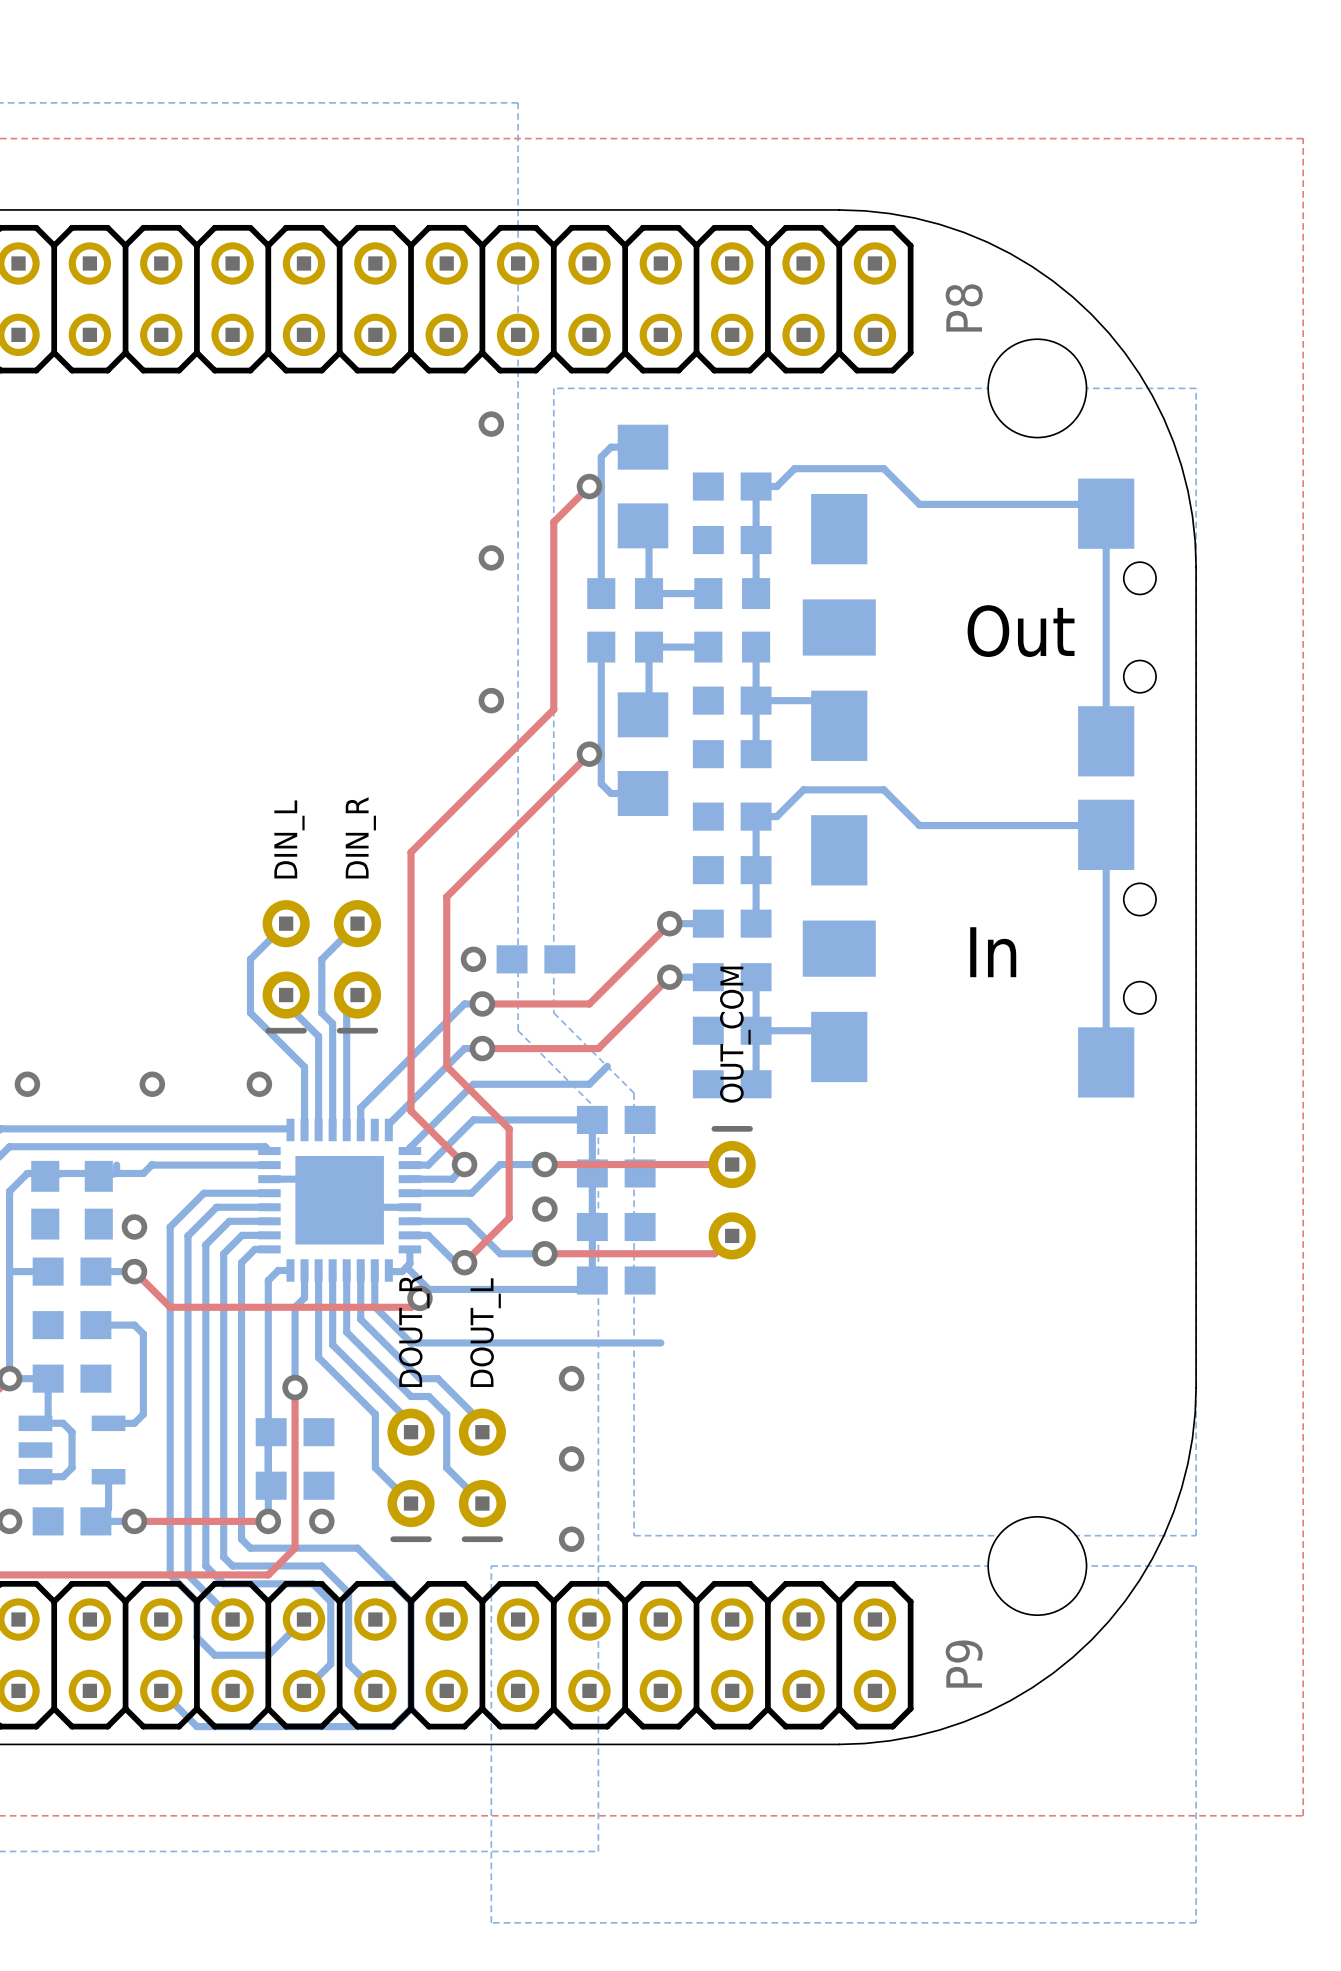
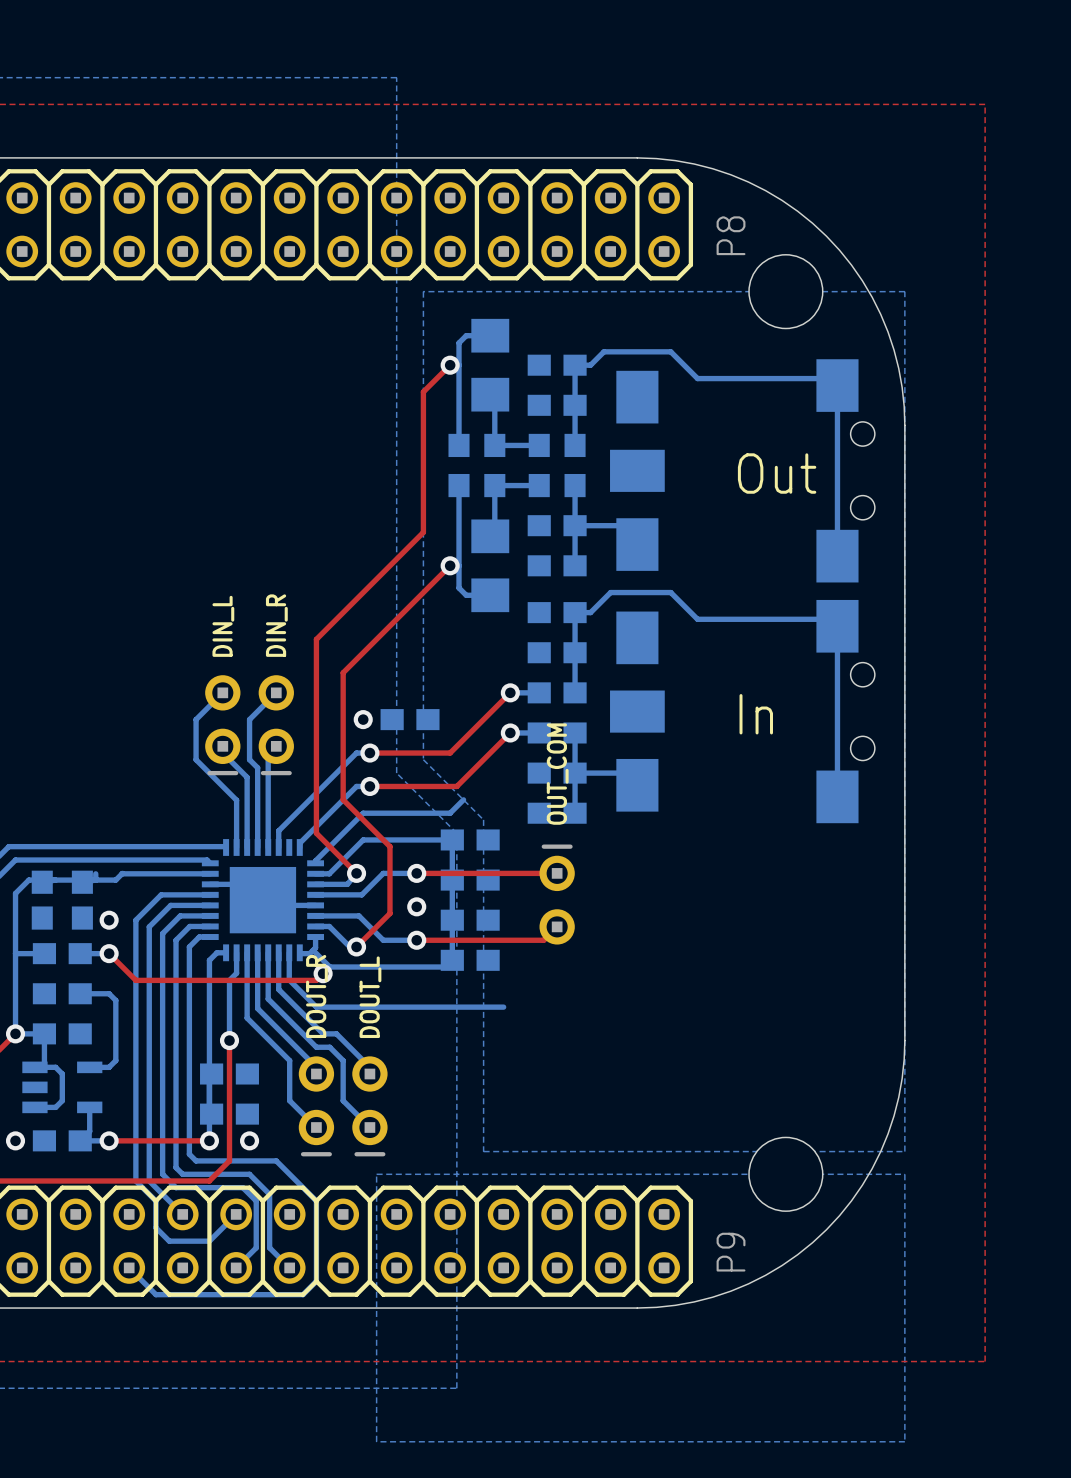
via: (491, 424) -> none
via: (491, 557) -> none
via: (491, 700) -> none
via: (27, 1084) -> none
via: (152, 1084) -> none
via: (259, 1084) -> none
via: (571, 1378) -> none
via: (571, 1458) -> none
via: (571, 1539) -> none

